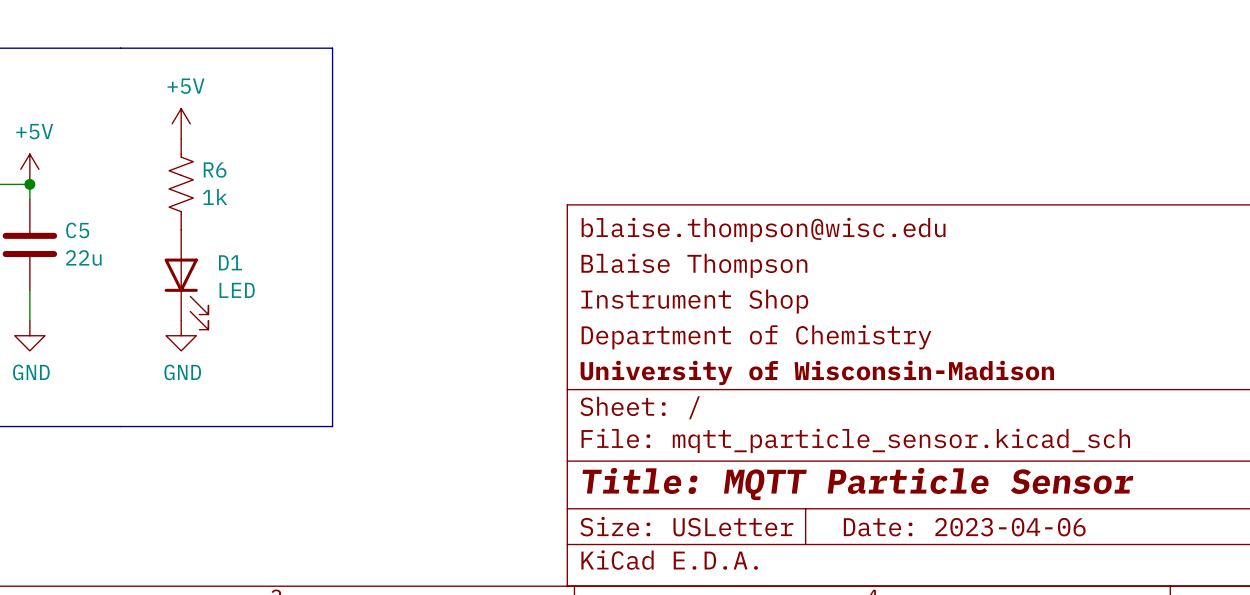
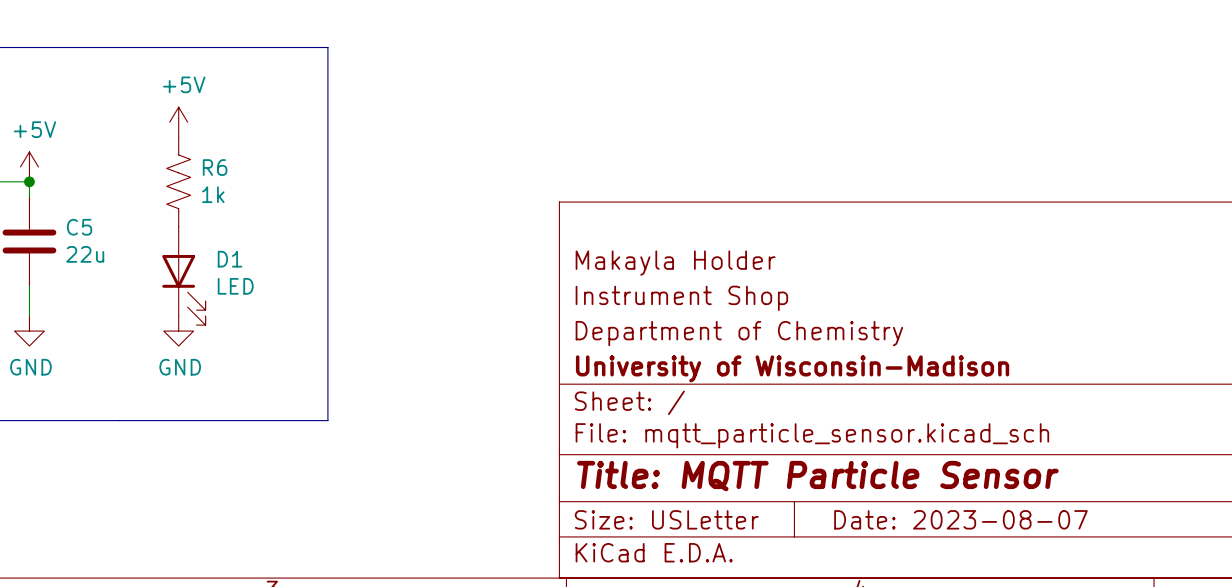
title block: blaise.thompson@wisc.edu (763, 229) -> none
title block: Blaise Thompson (694, 265) -> Makayla Holder (675, 263)
title block: Date: 2023-04-06 (964, 527) -> Date: 2023-08-07 (960, 519)

